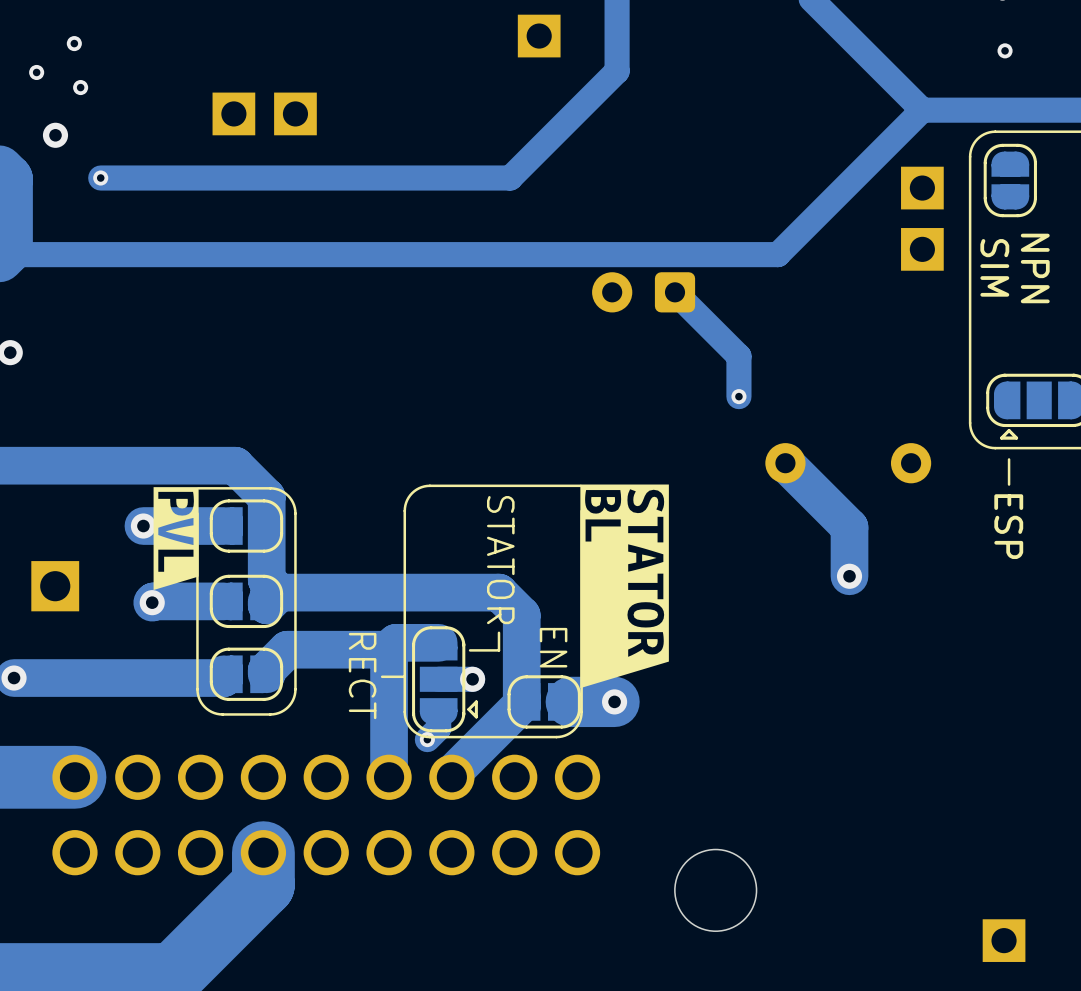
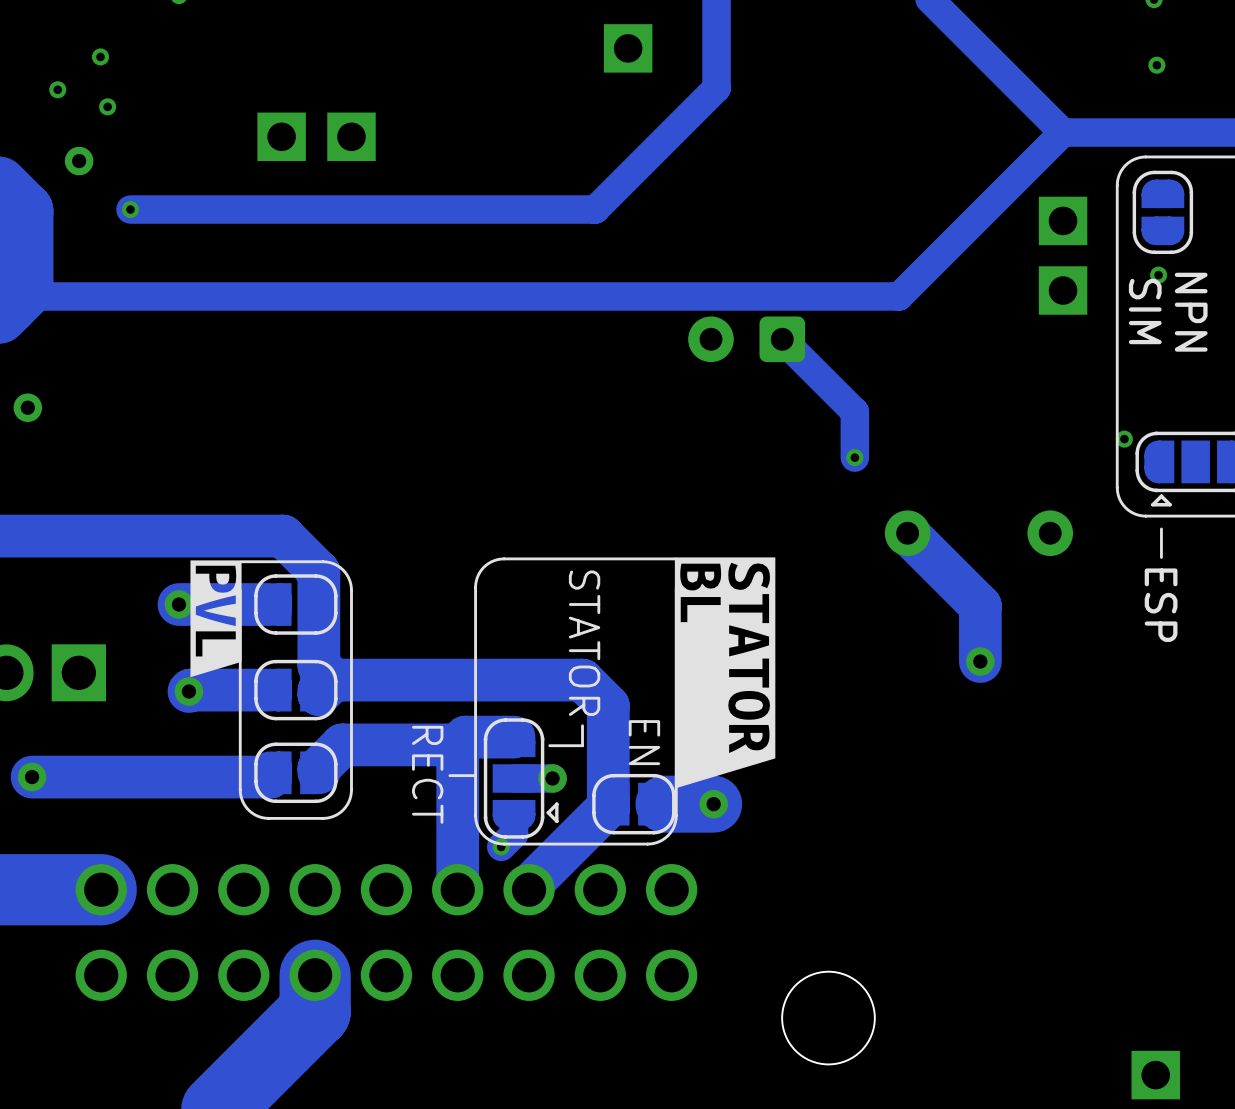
via: none -> (1158, 275)
via: none -> (1124, 439)

